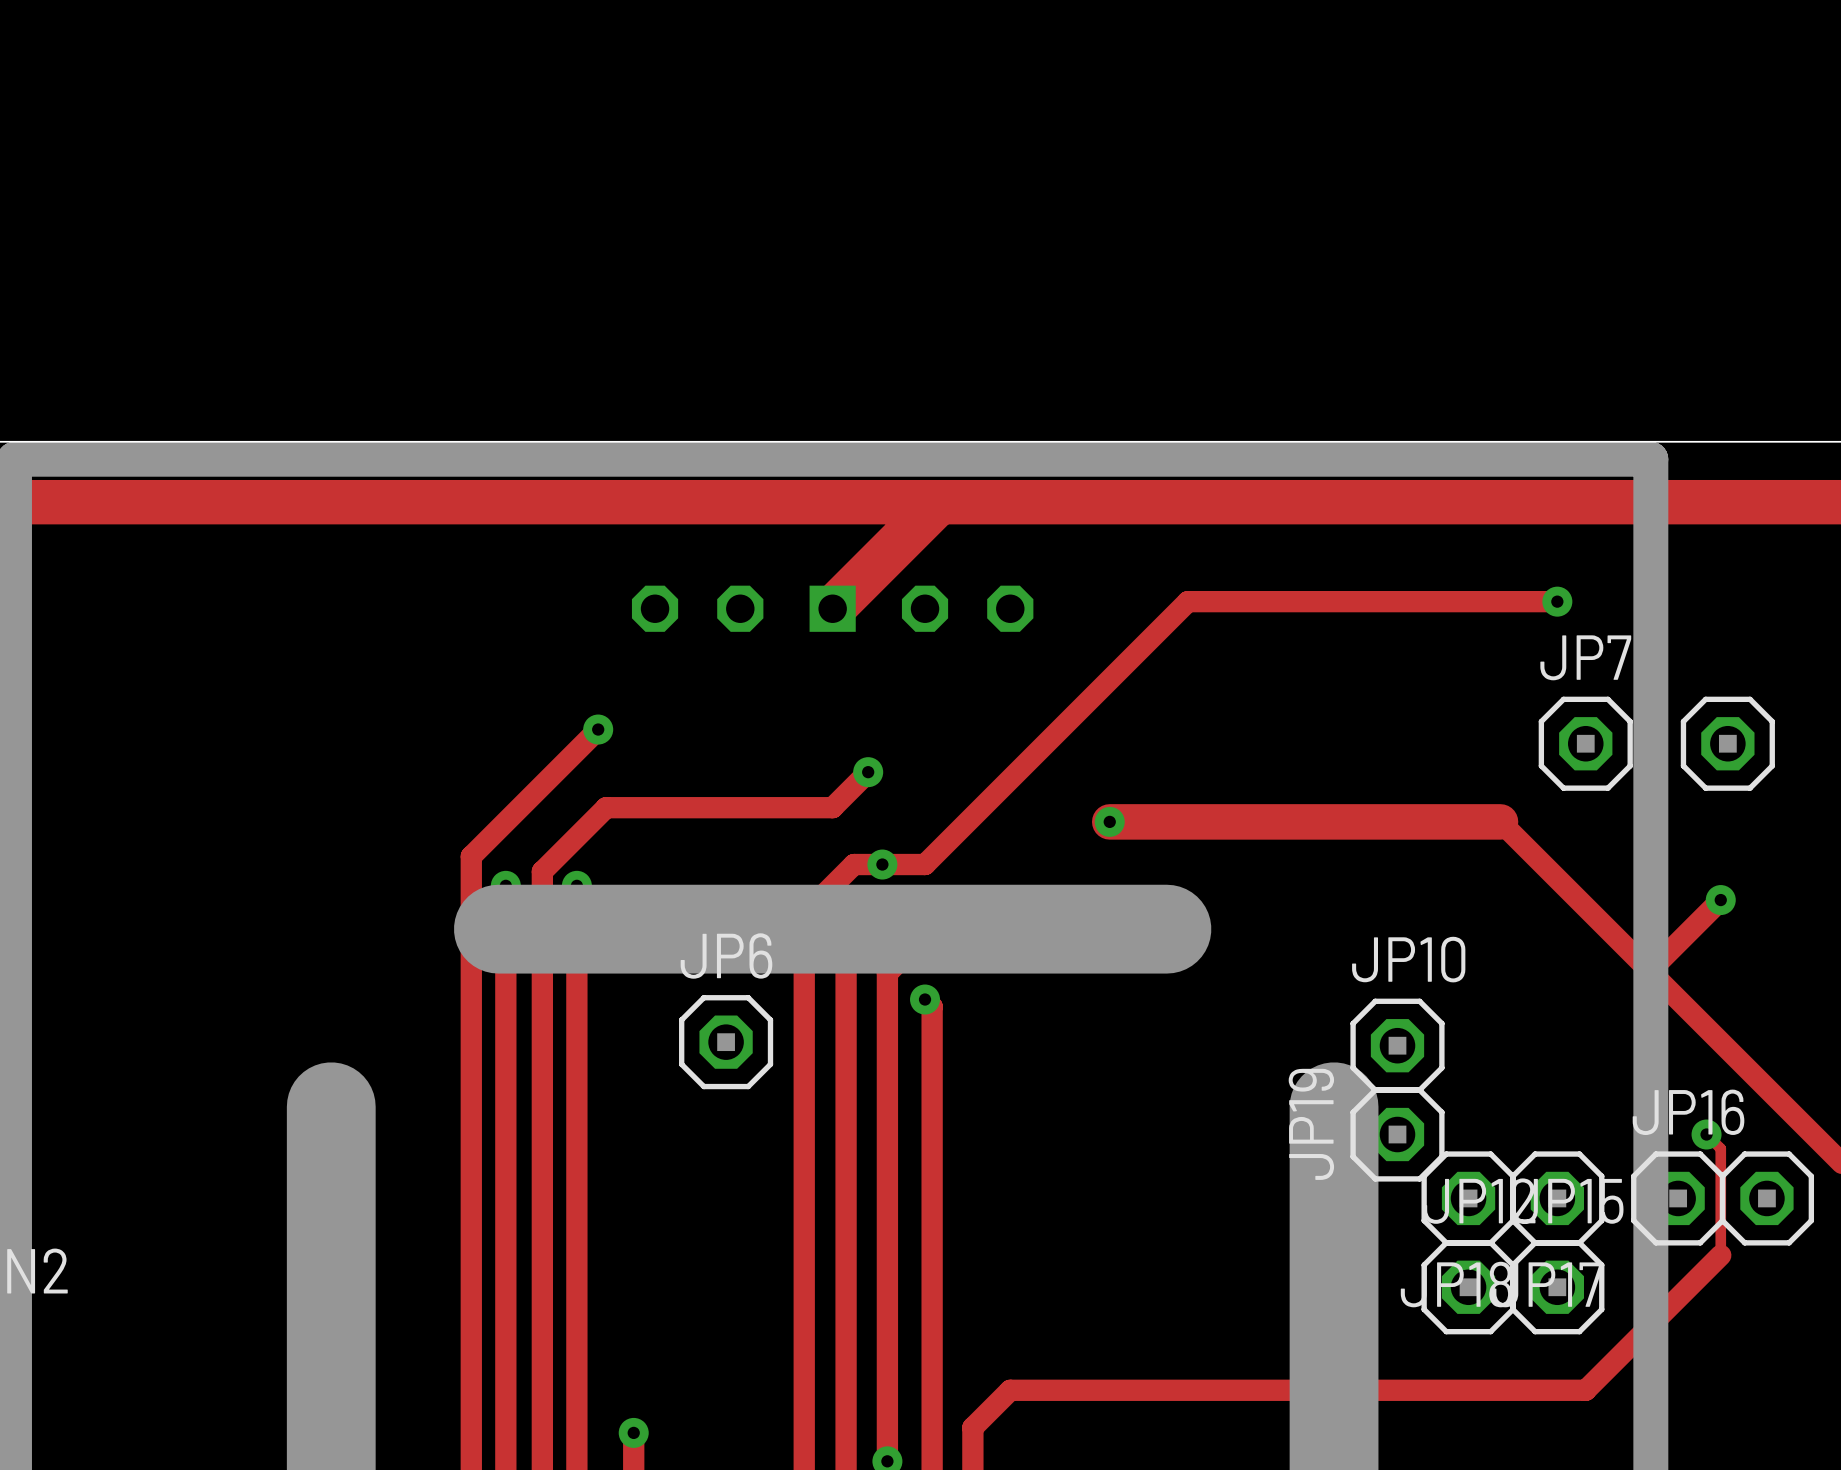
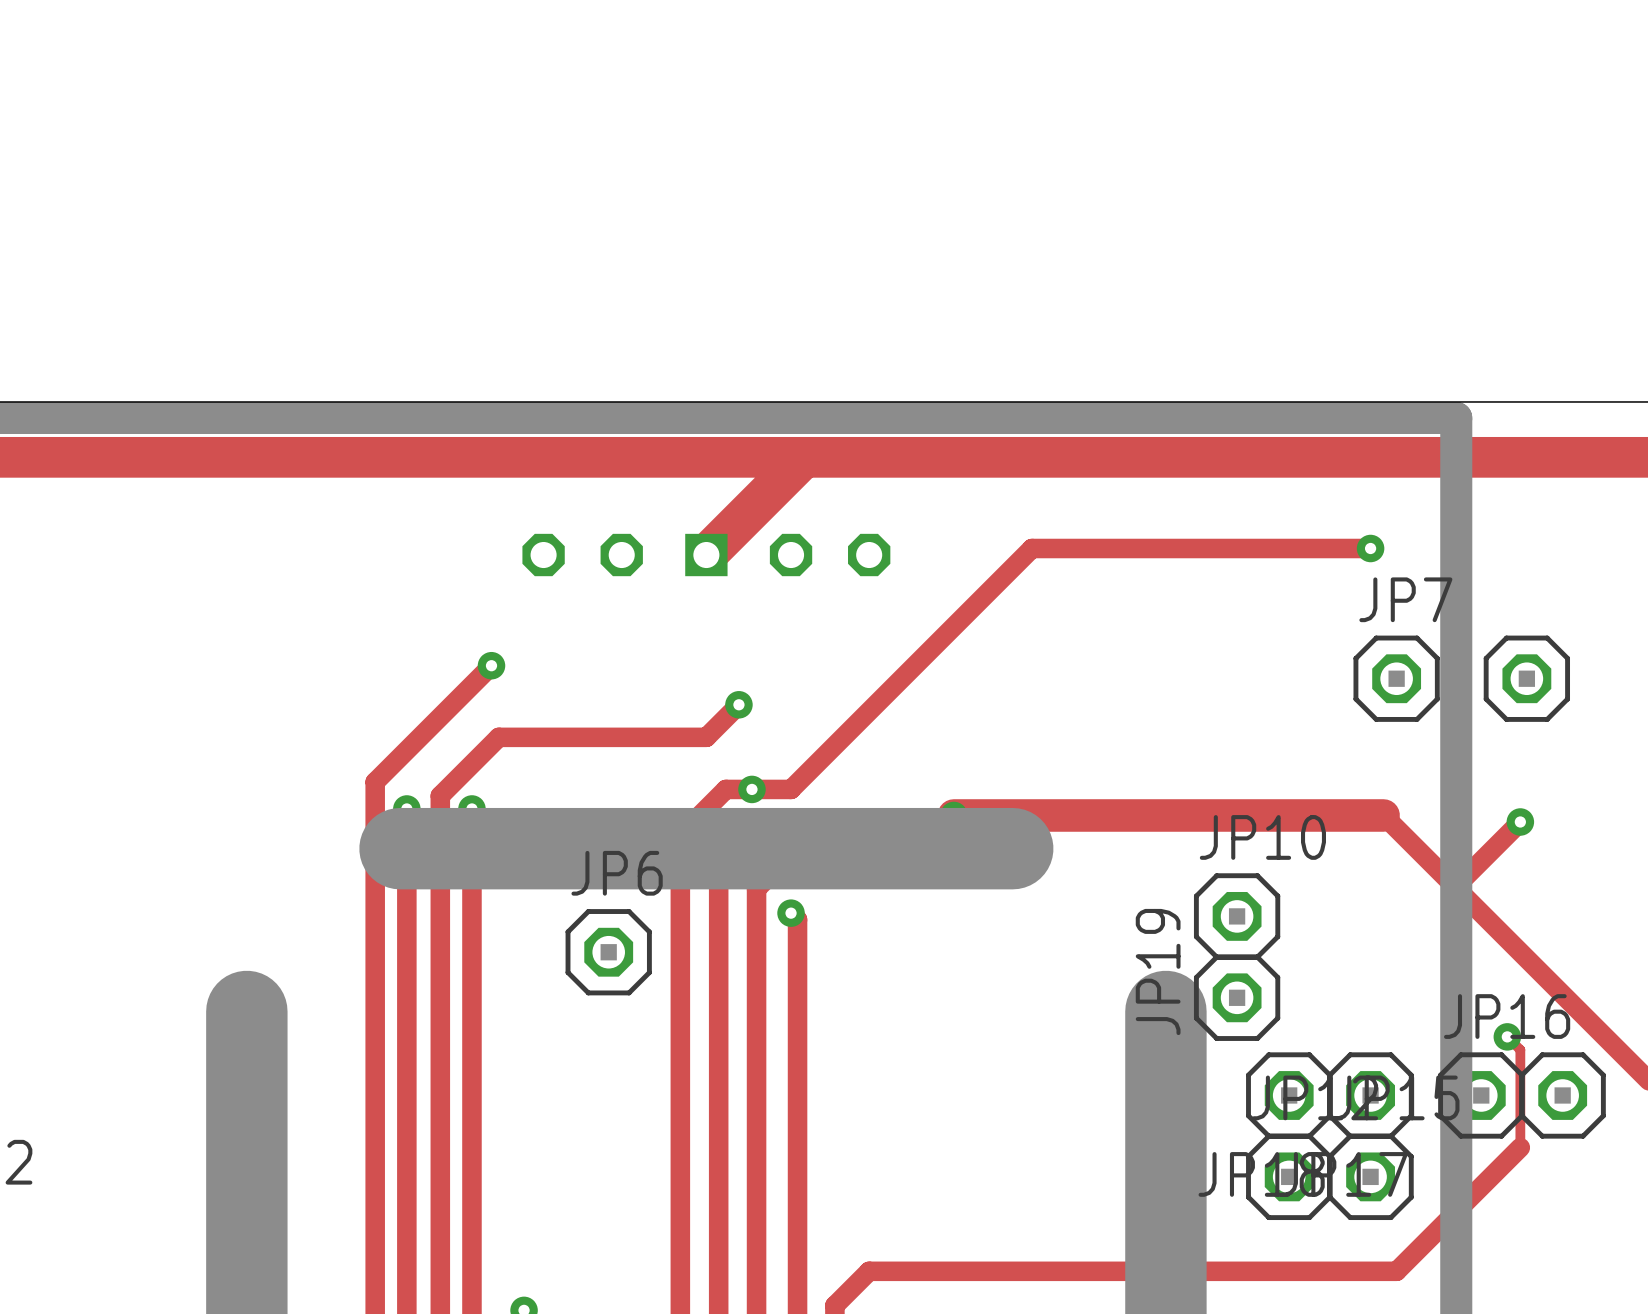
track: (1109, 821) (1500, 821) (1571, 892) -> (953, 815) (1383, 815)
via position: (1109, 821) -> (953, 815)
JP10 position: (1397, 1045) -> (1237, 916)
JP19 position: (1397, 1134) -> (1237, 997)

